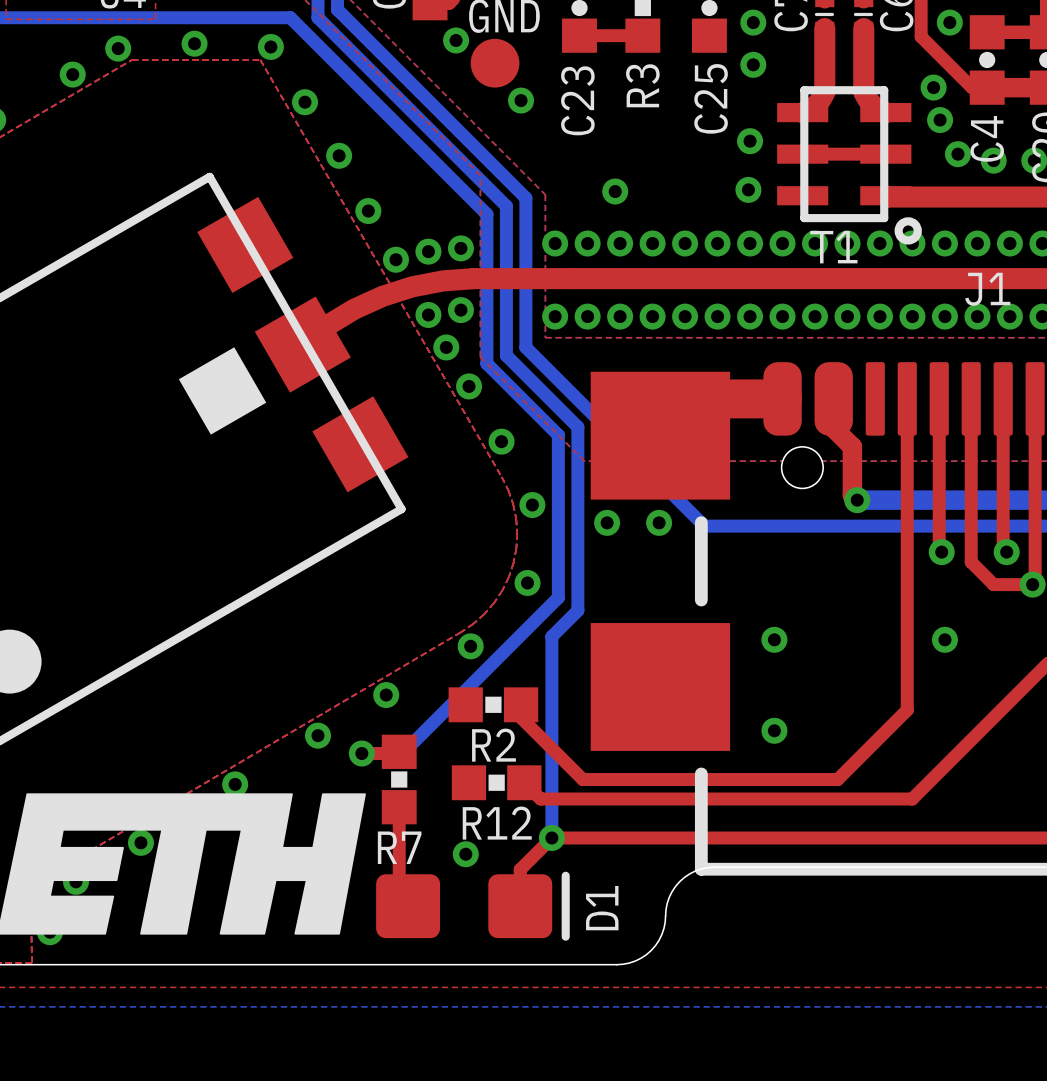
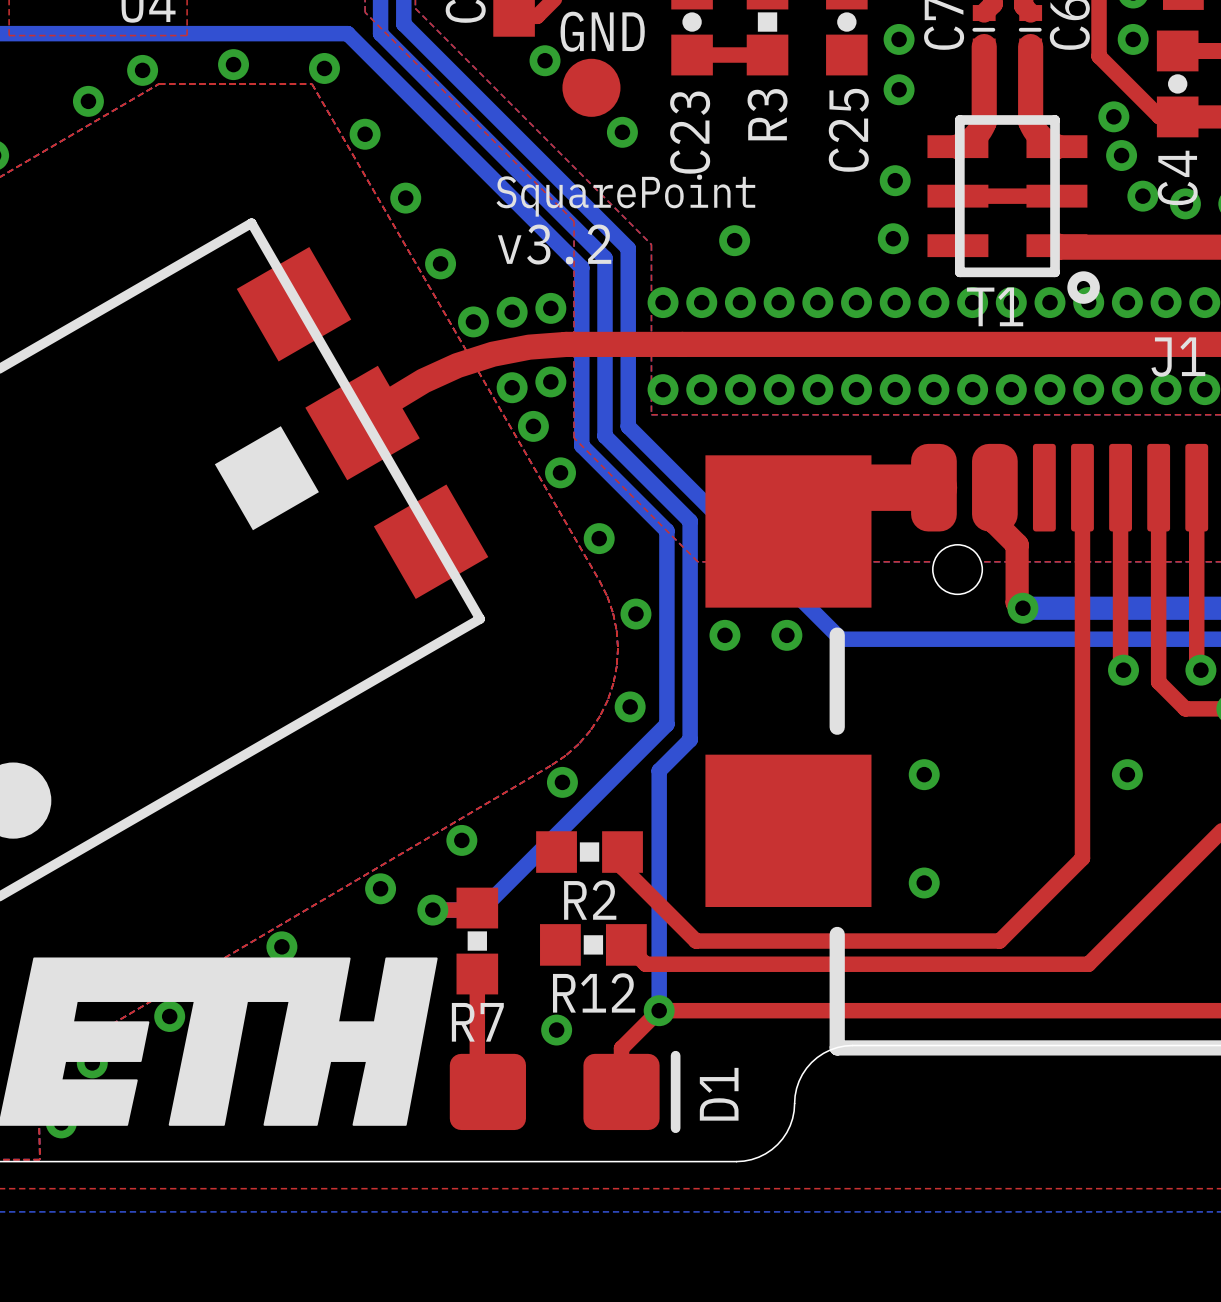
text: none -> SquarePoint (625, 195)
text: none -> v3.2 (554, 244)

